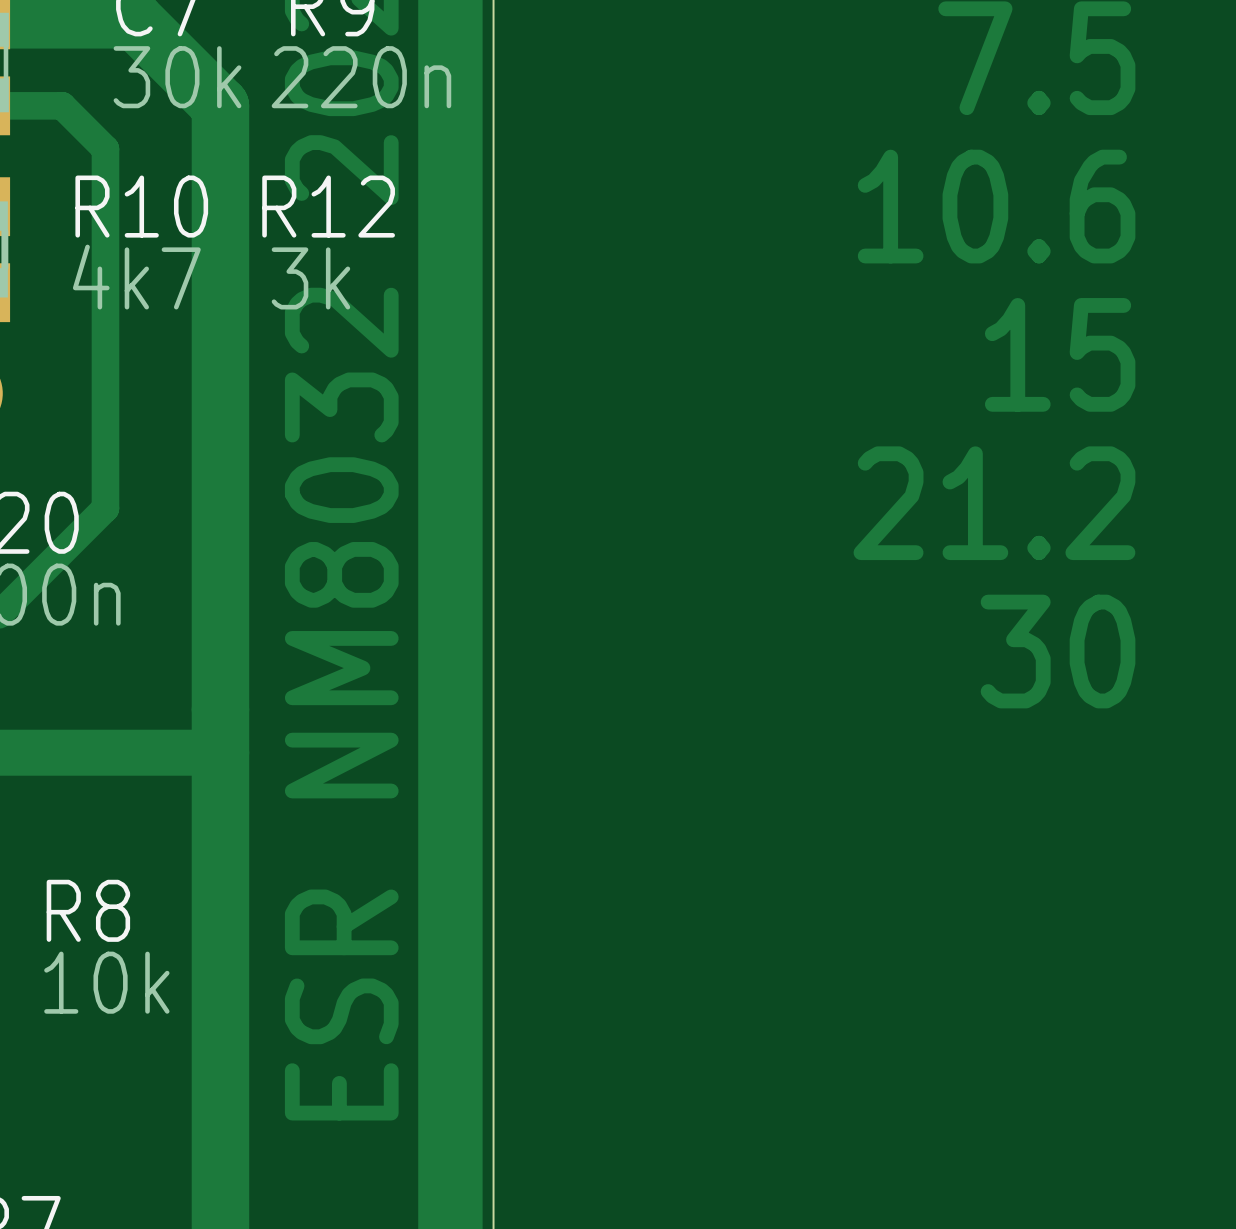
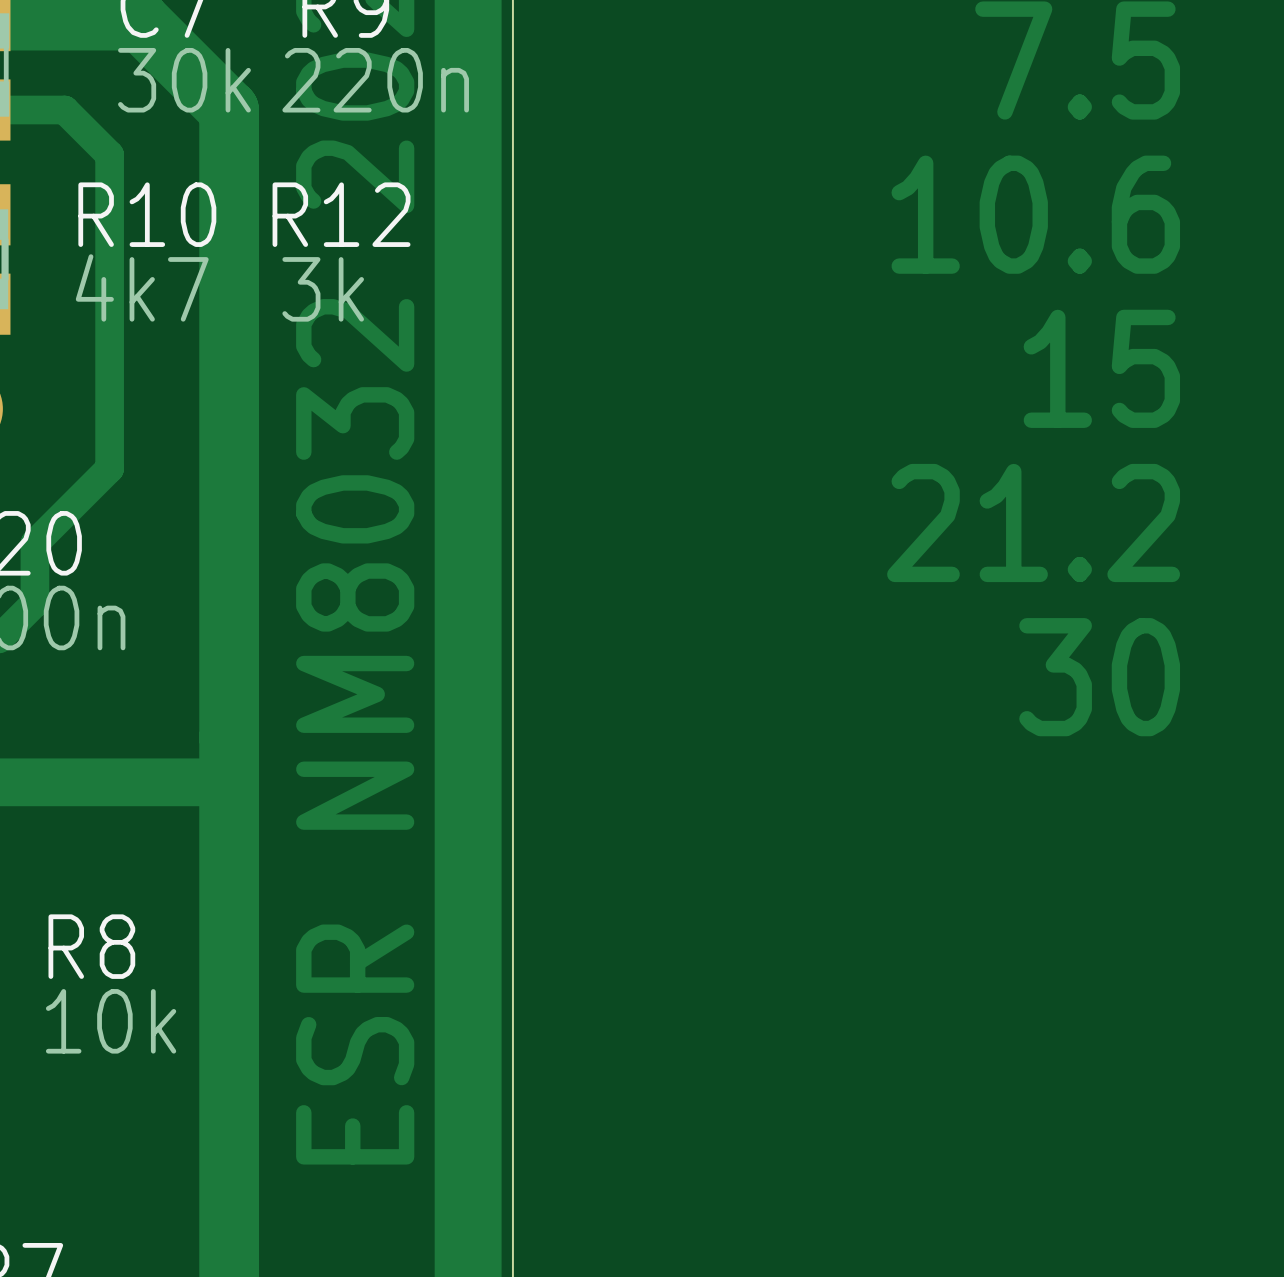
track: (105, 450) (105, 508) (33, 580) -> (109, 468) (34, 543) (34, 603)

